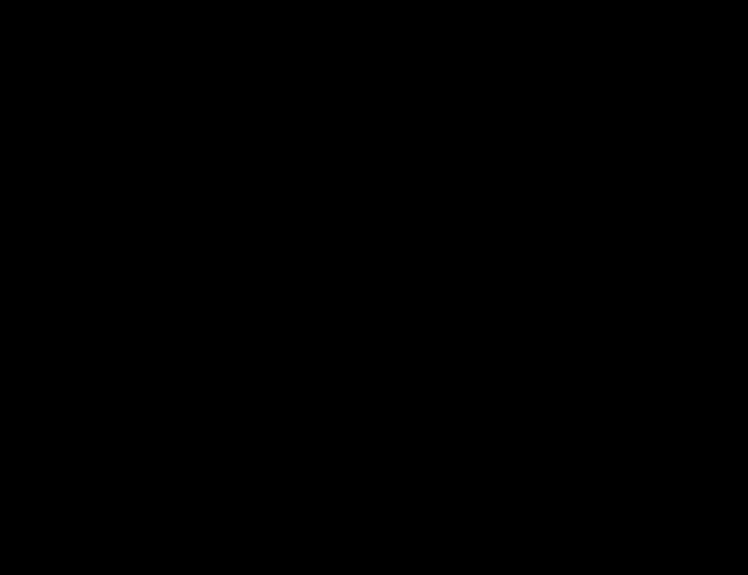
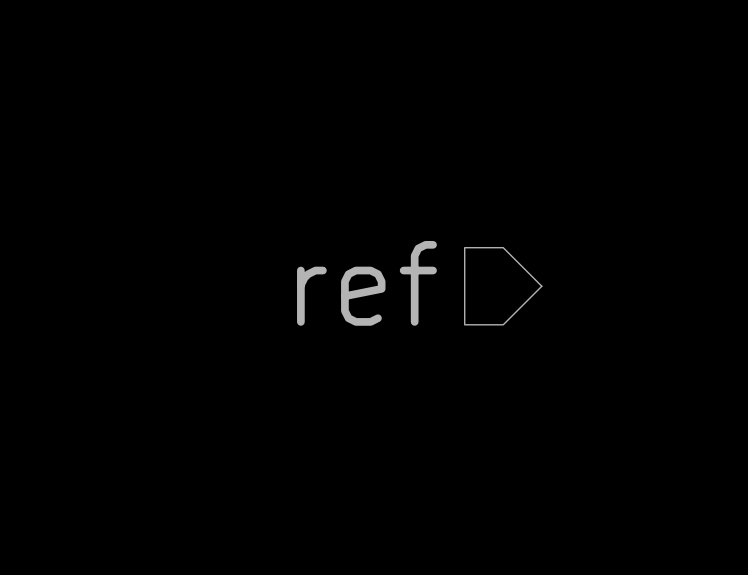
hierarchical label: none -> ref (366, 283)

